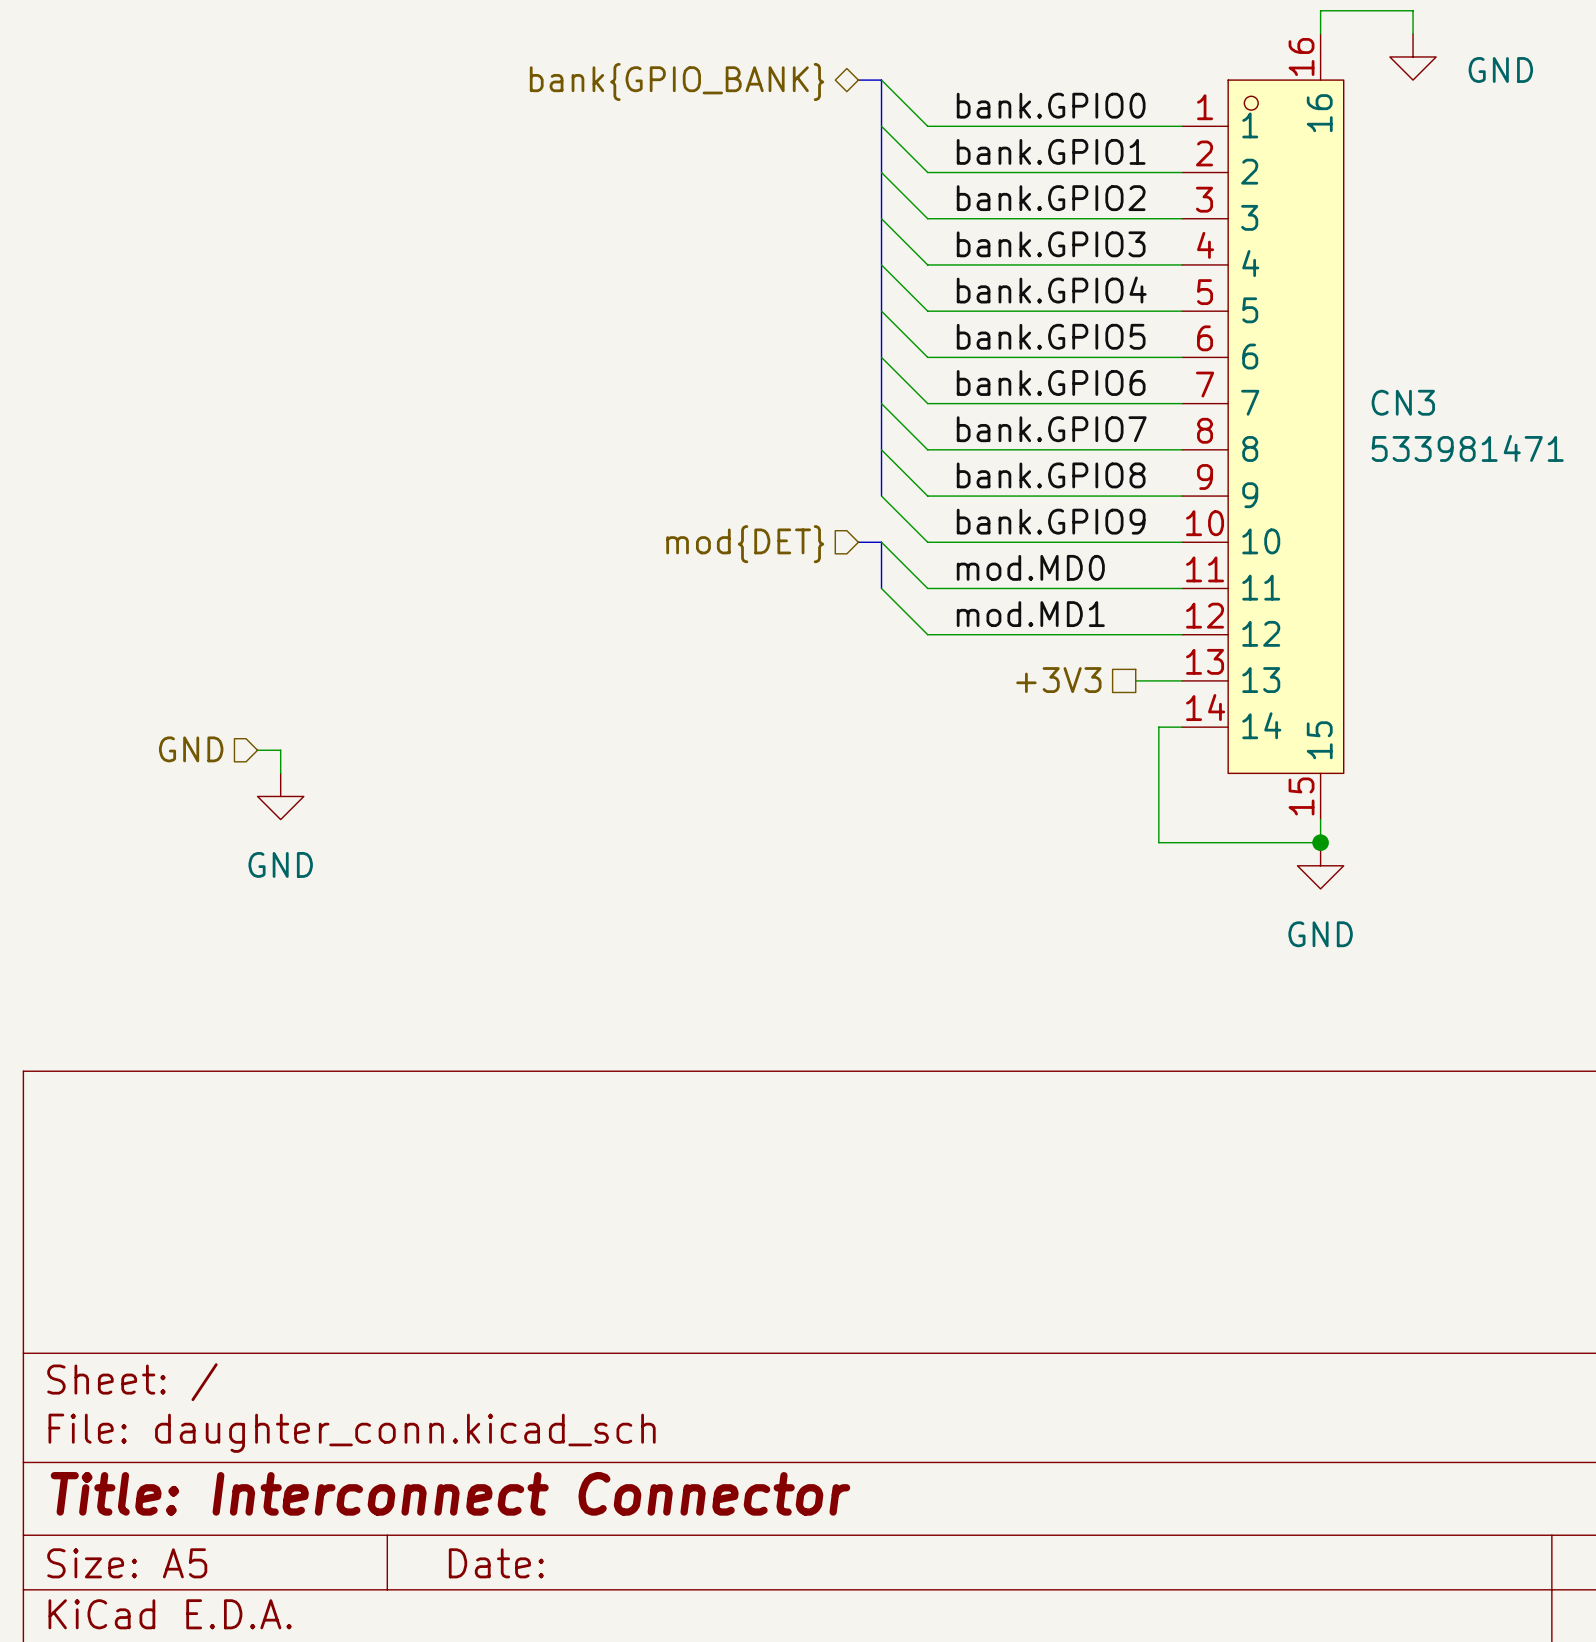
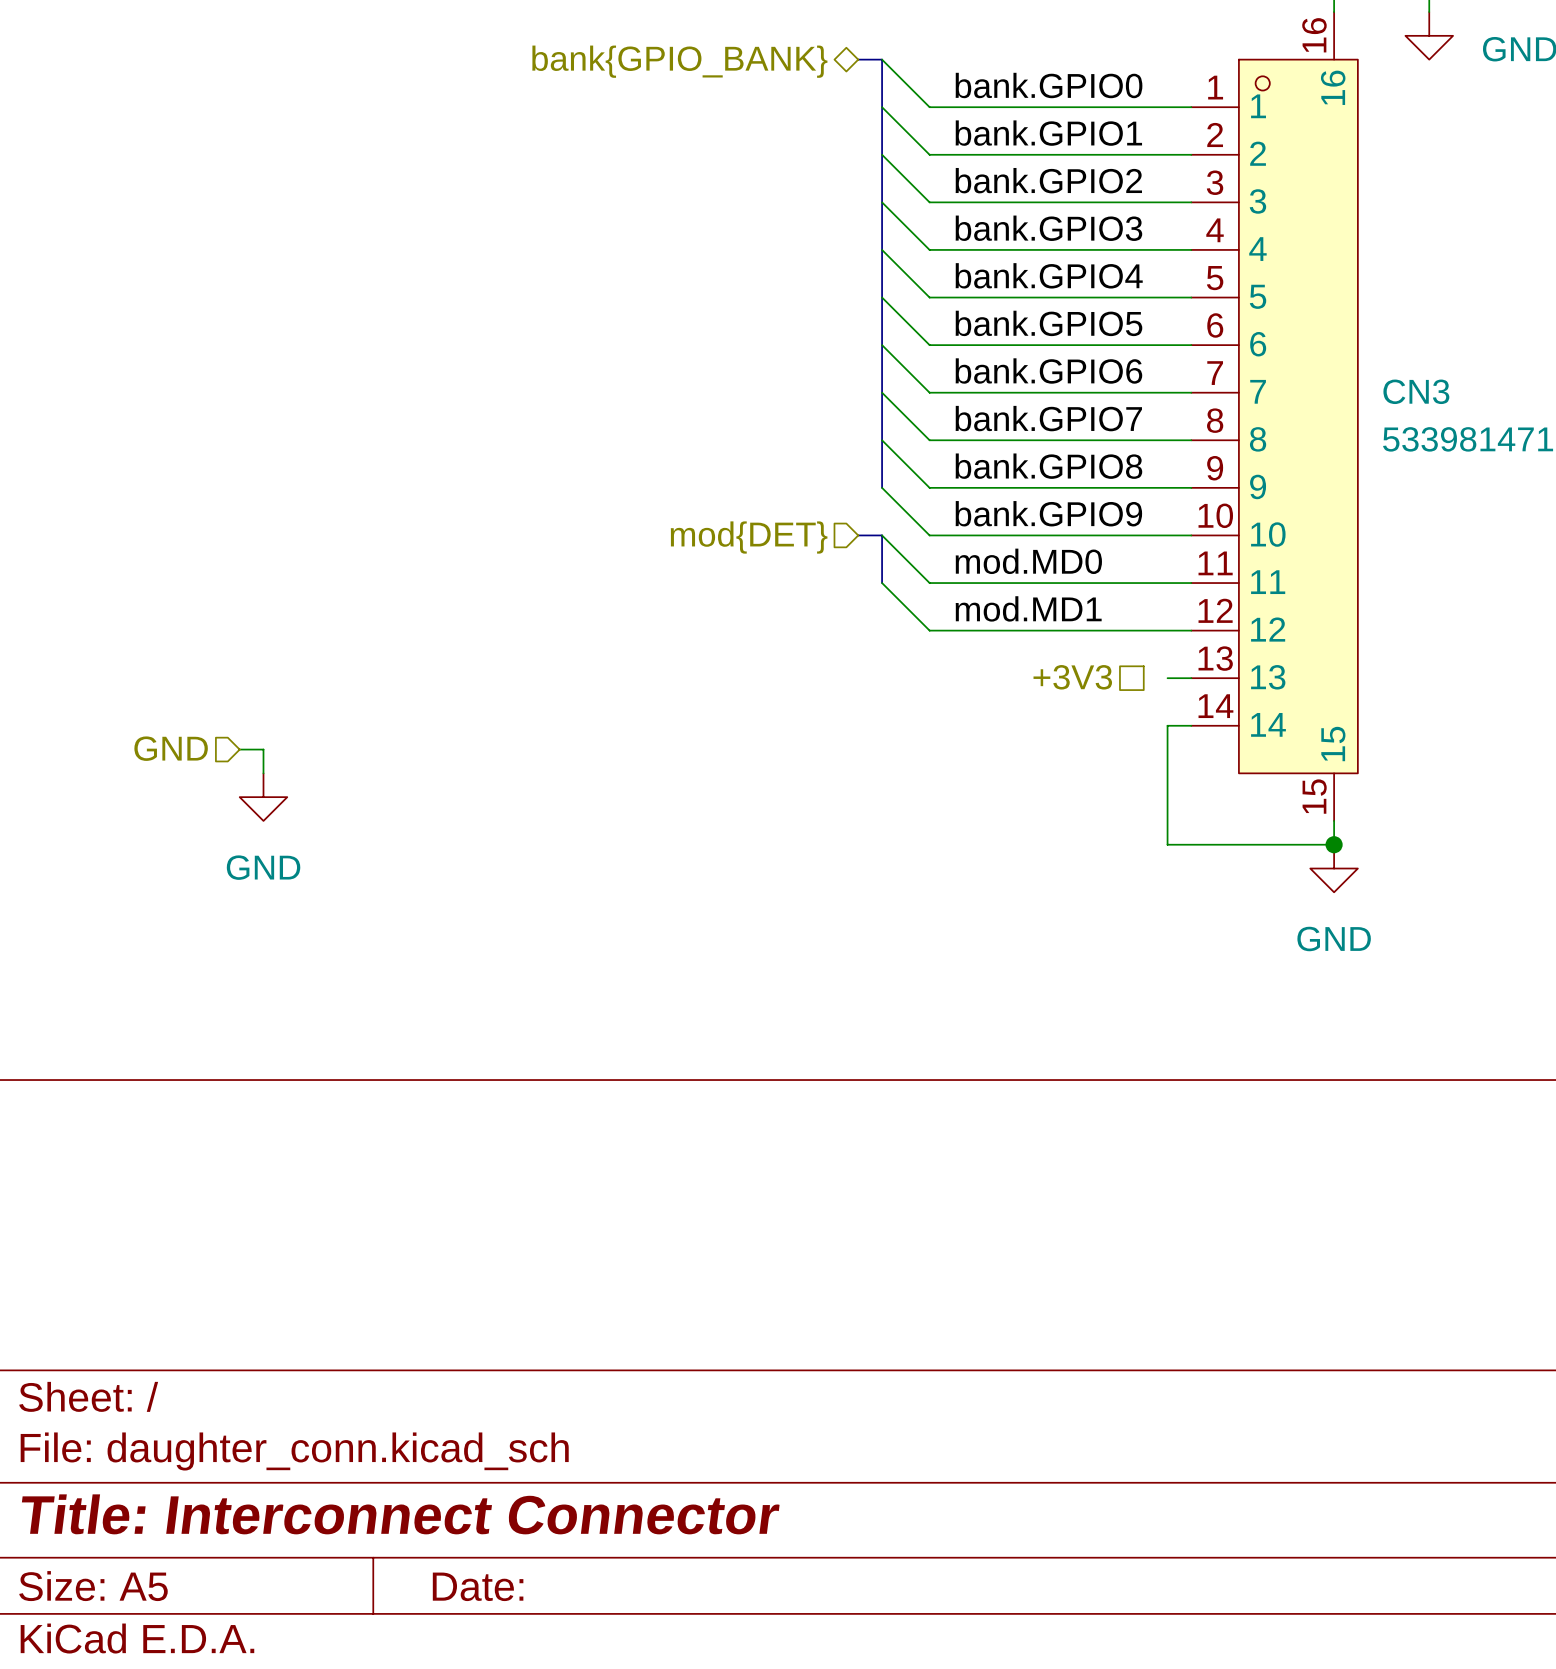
wire: (1135, 680) (1158, 680) -> none

